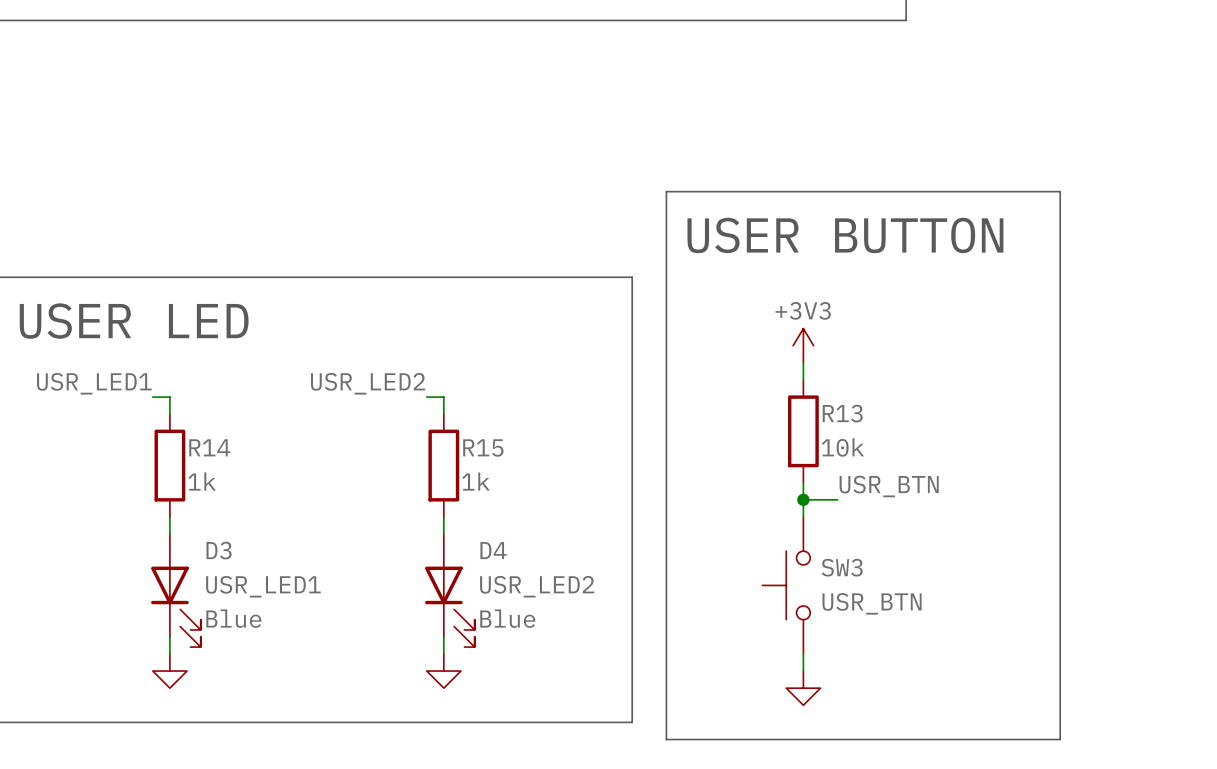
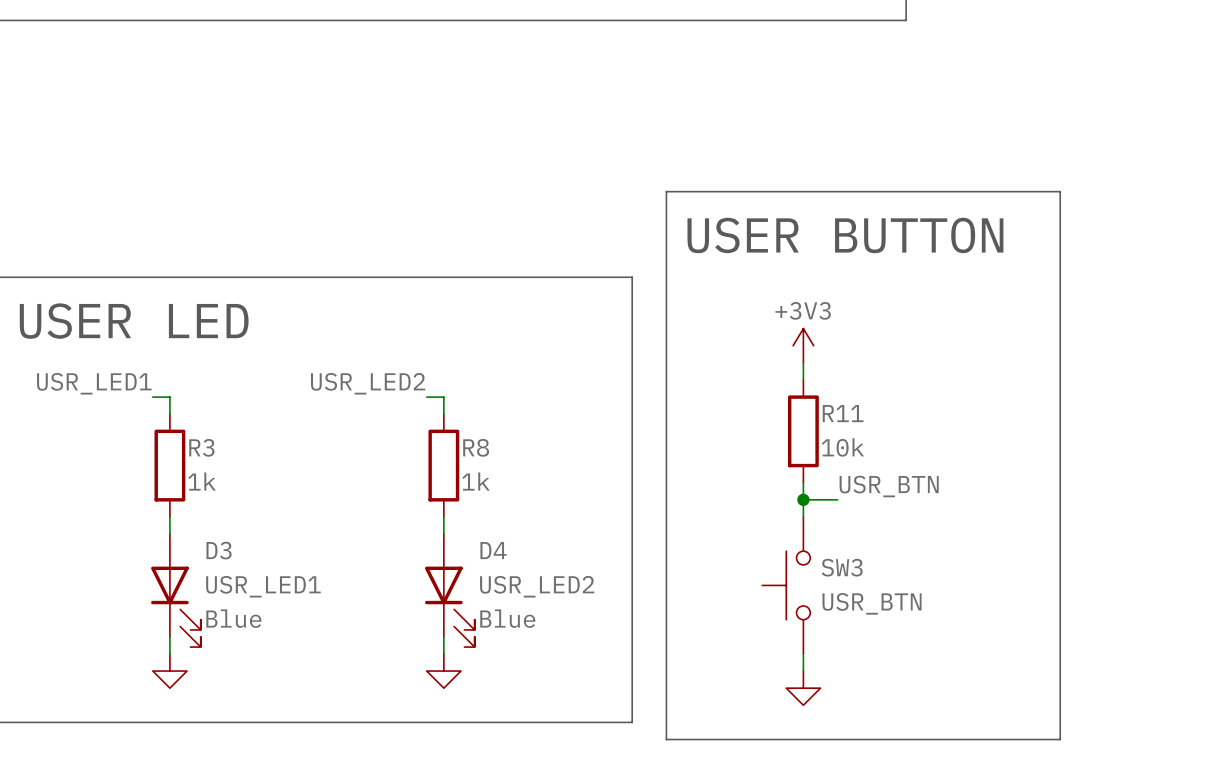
R13 name: R13 (842, 413) -> R11 (843, 413)
R14 name: R14 (209, 447) -> R3 (201, 447)
R15 name: R15 (483, 447) -> R8 (476, 447)

